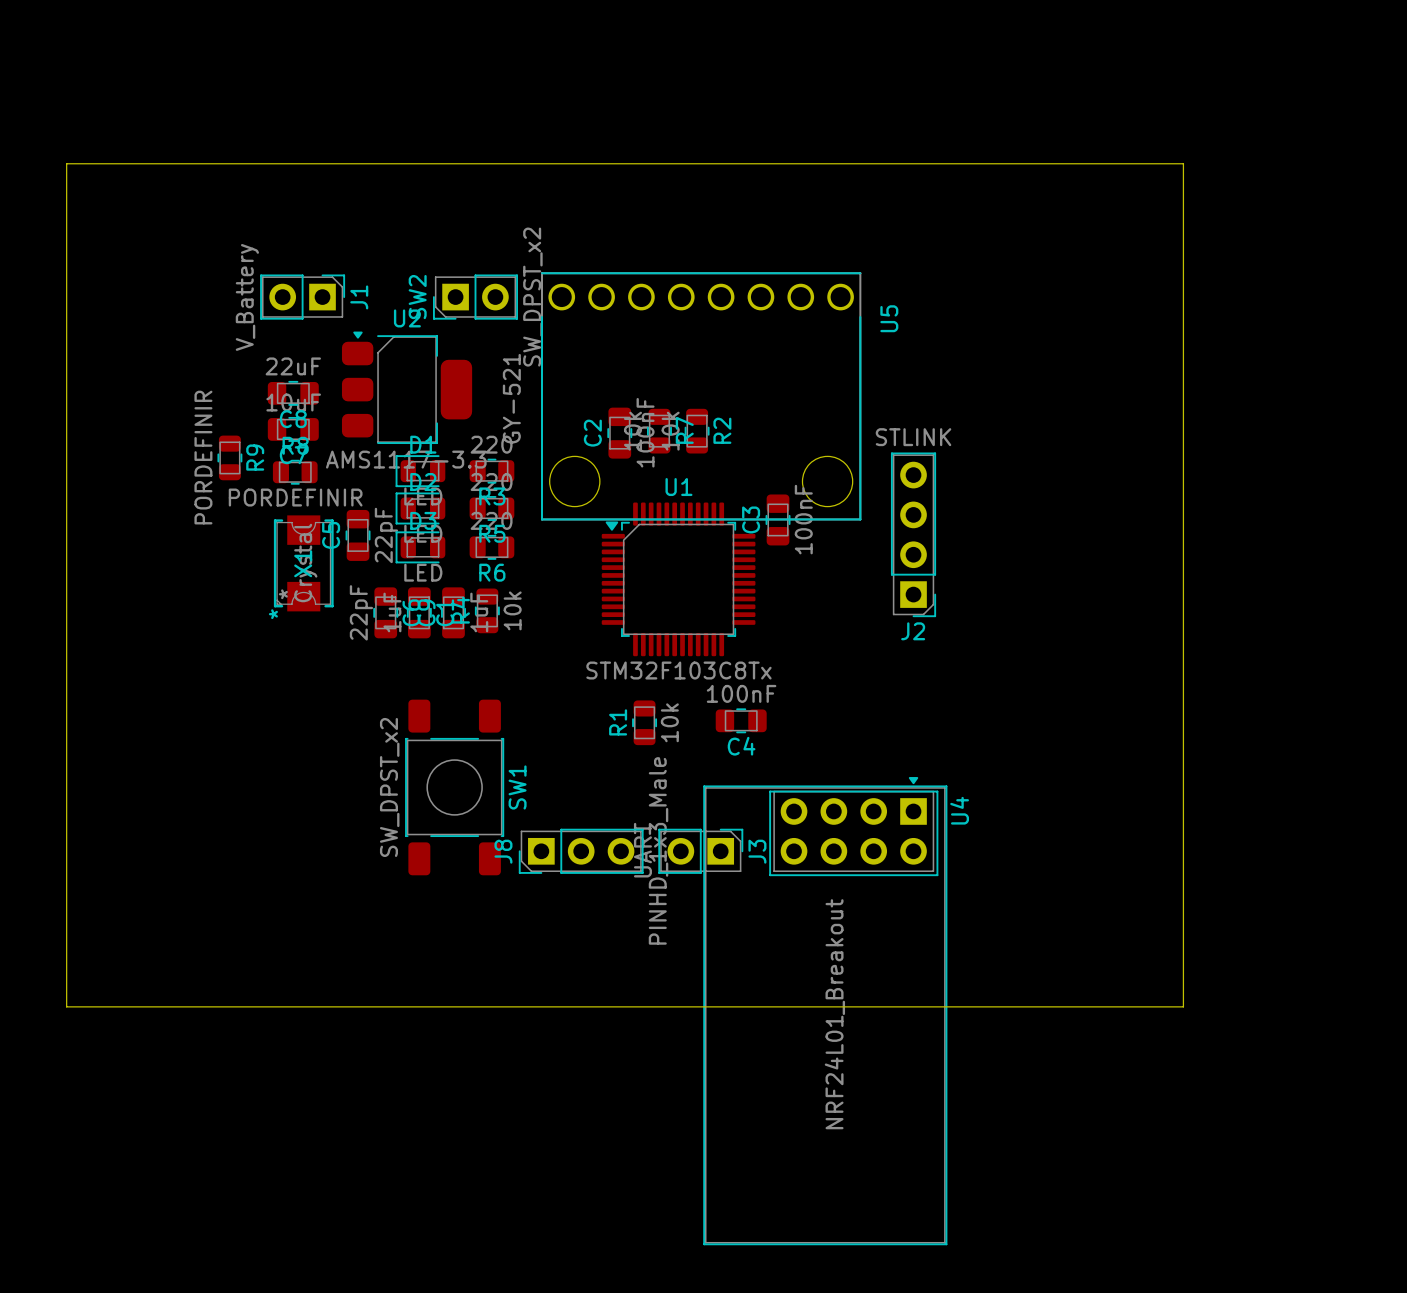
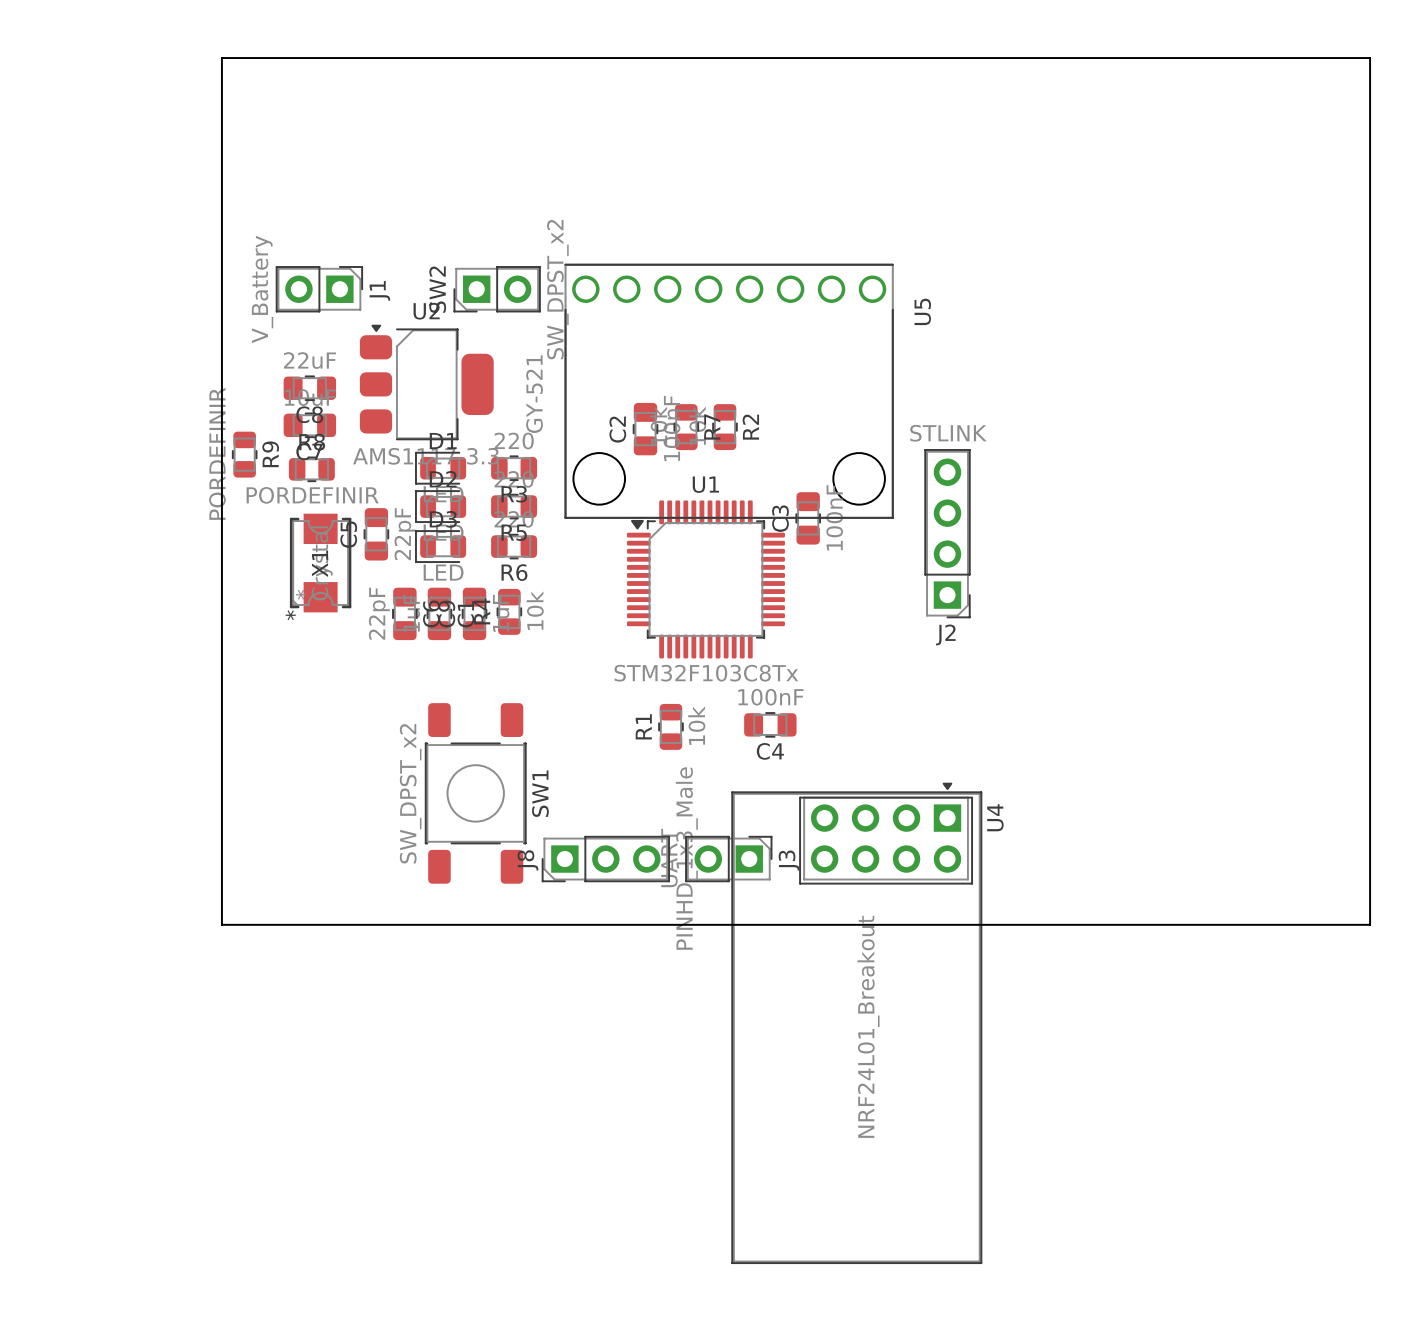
board edge: (66, 163) (1183, 163) (1183, 1006) (66, 1006) (66, 163) -> (221, 58) (221, 924) (1370, 924) (1370, 58) (221, 58)

